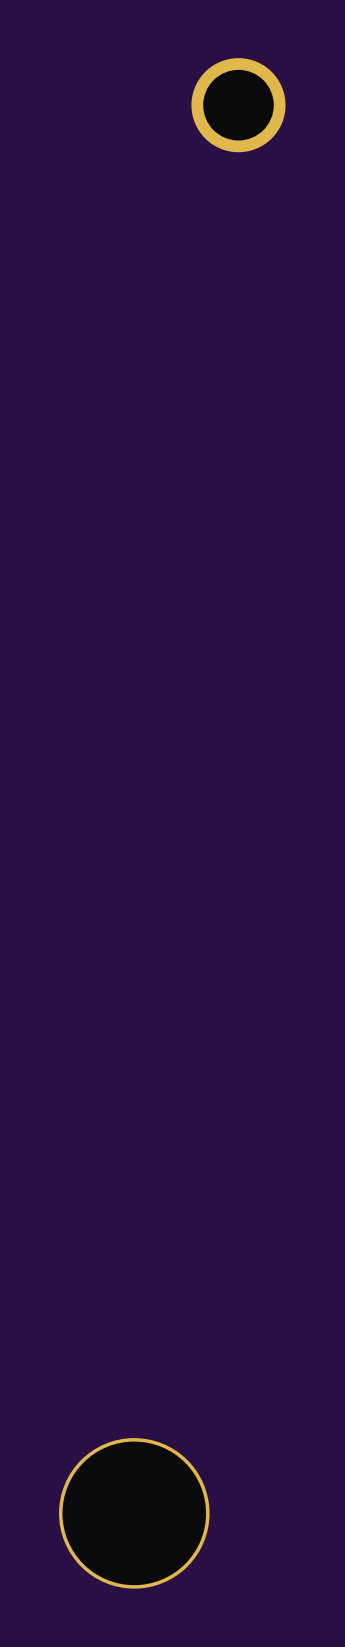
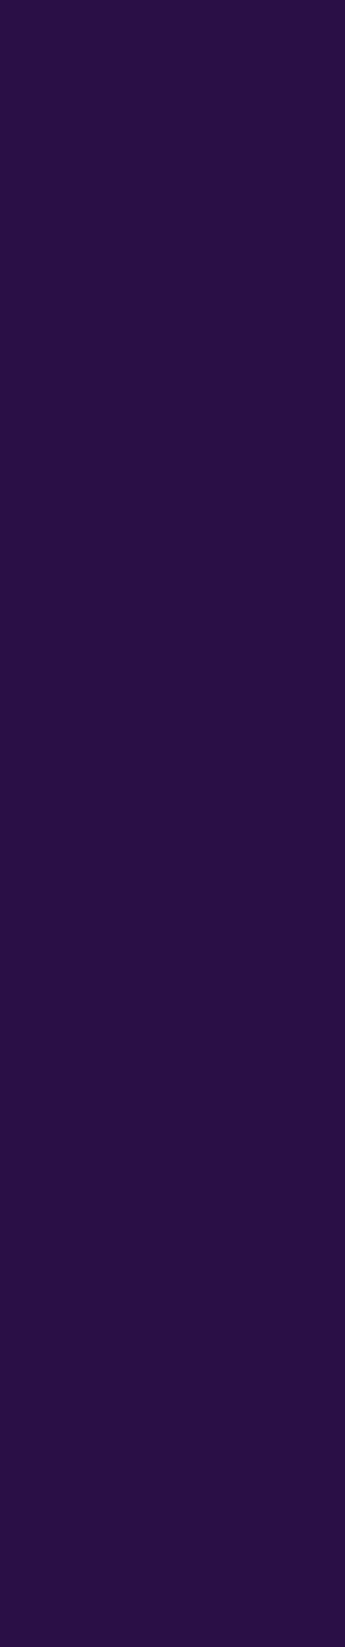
part: (238, 105) -> none
part: (134, 1513) -> none

